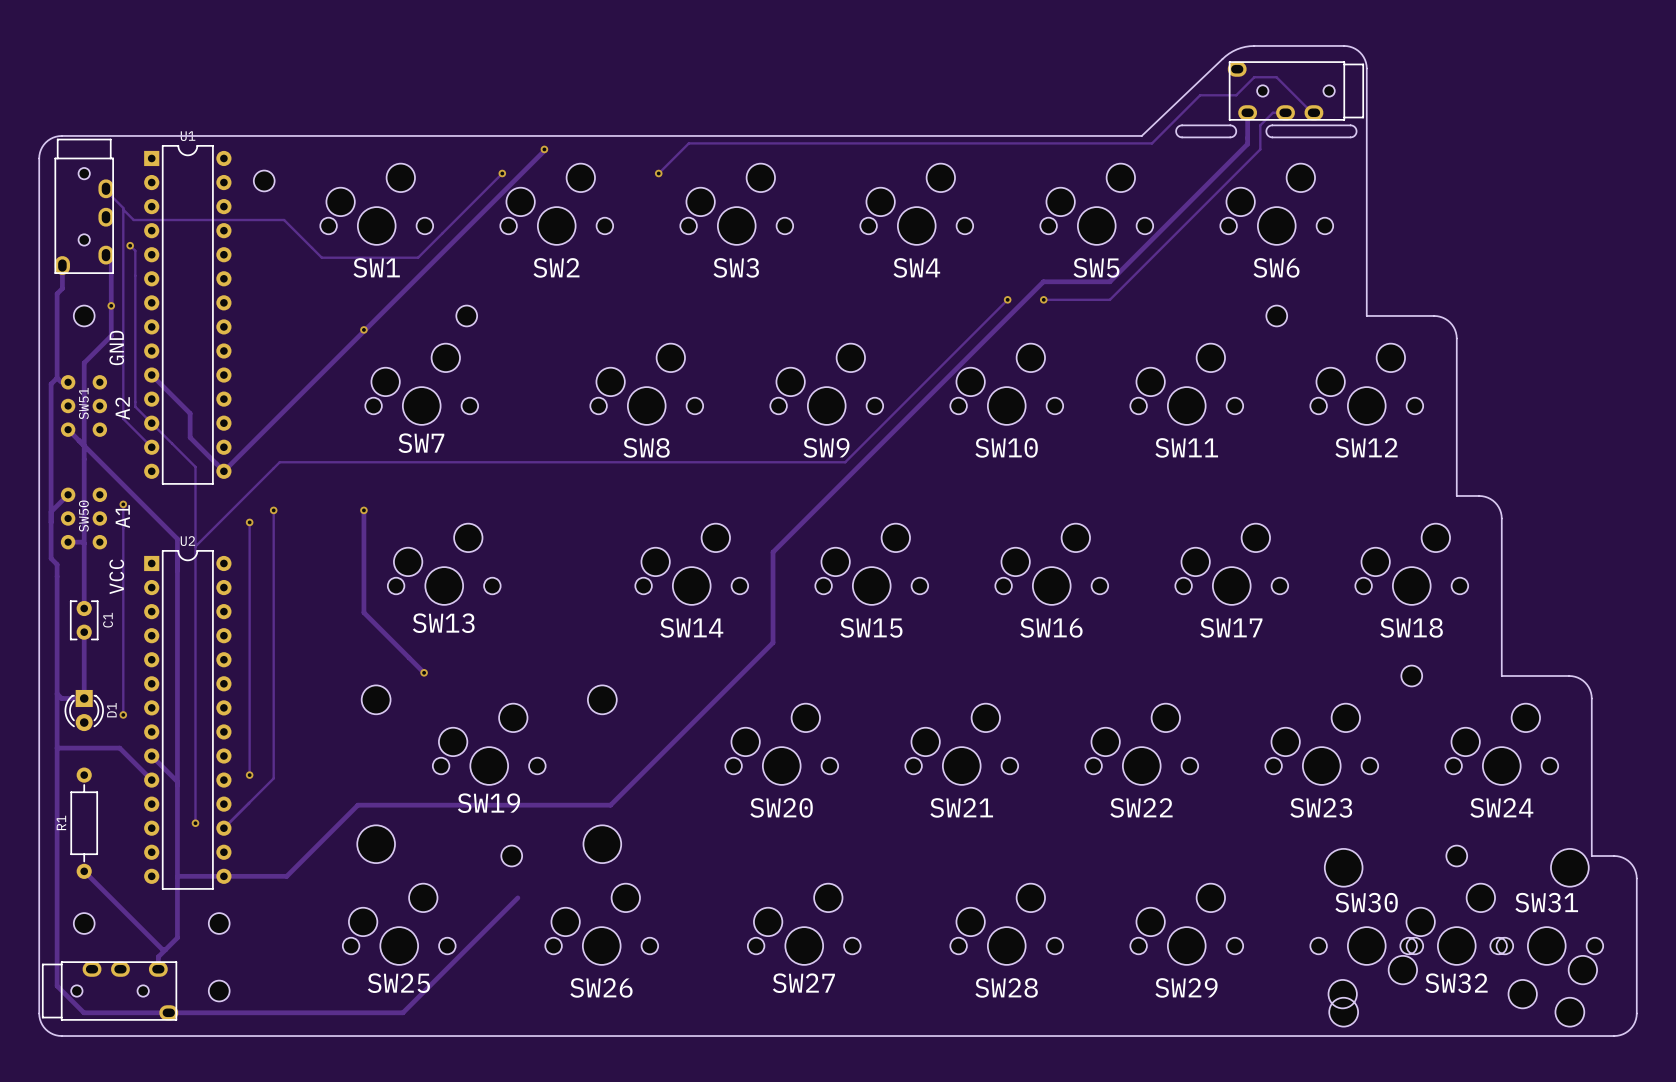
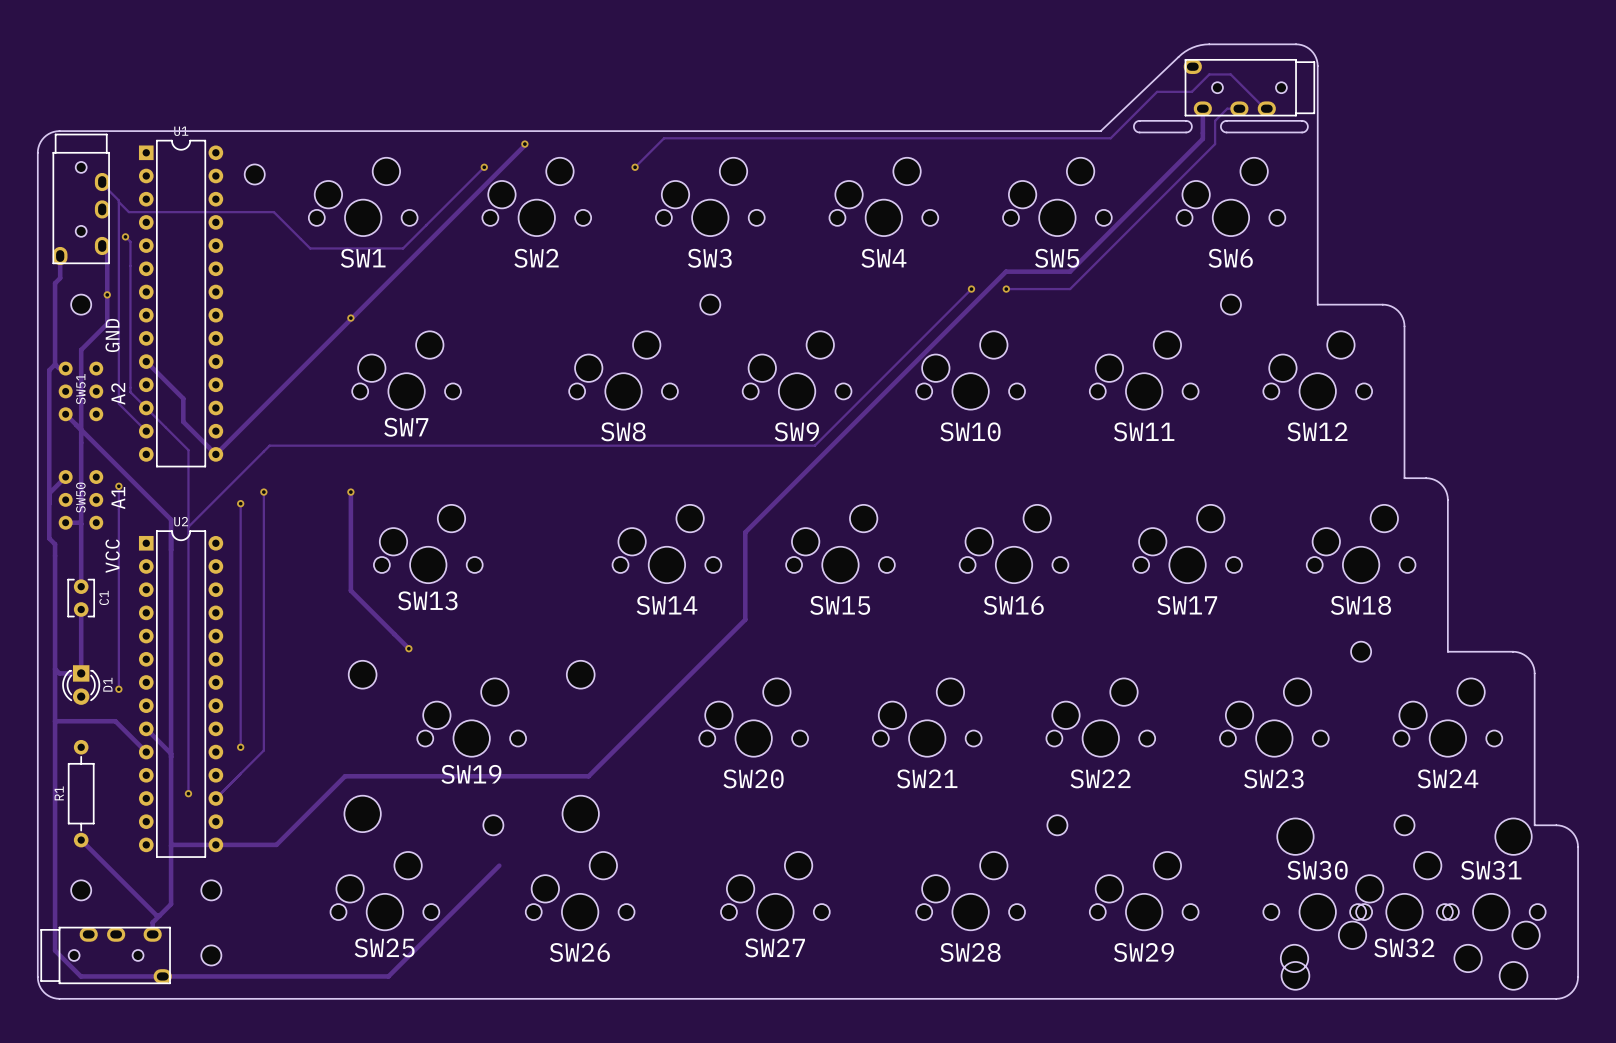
part: (466, 315) -> none
part: none -> (710, 304)
part: none -> (1057, 825)

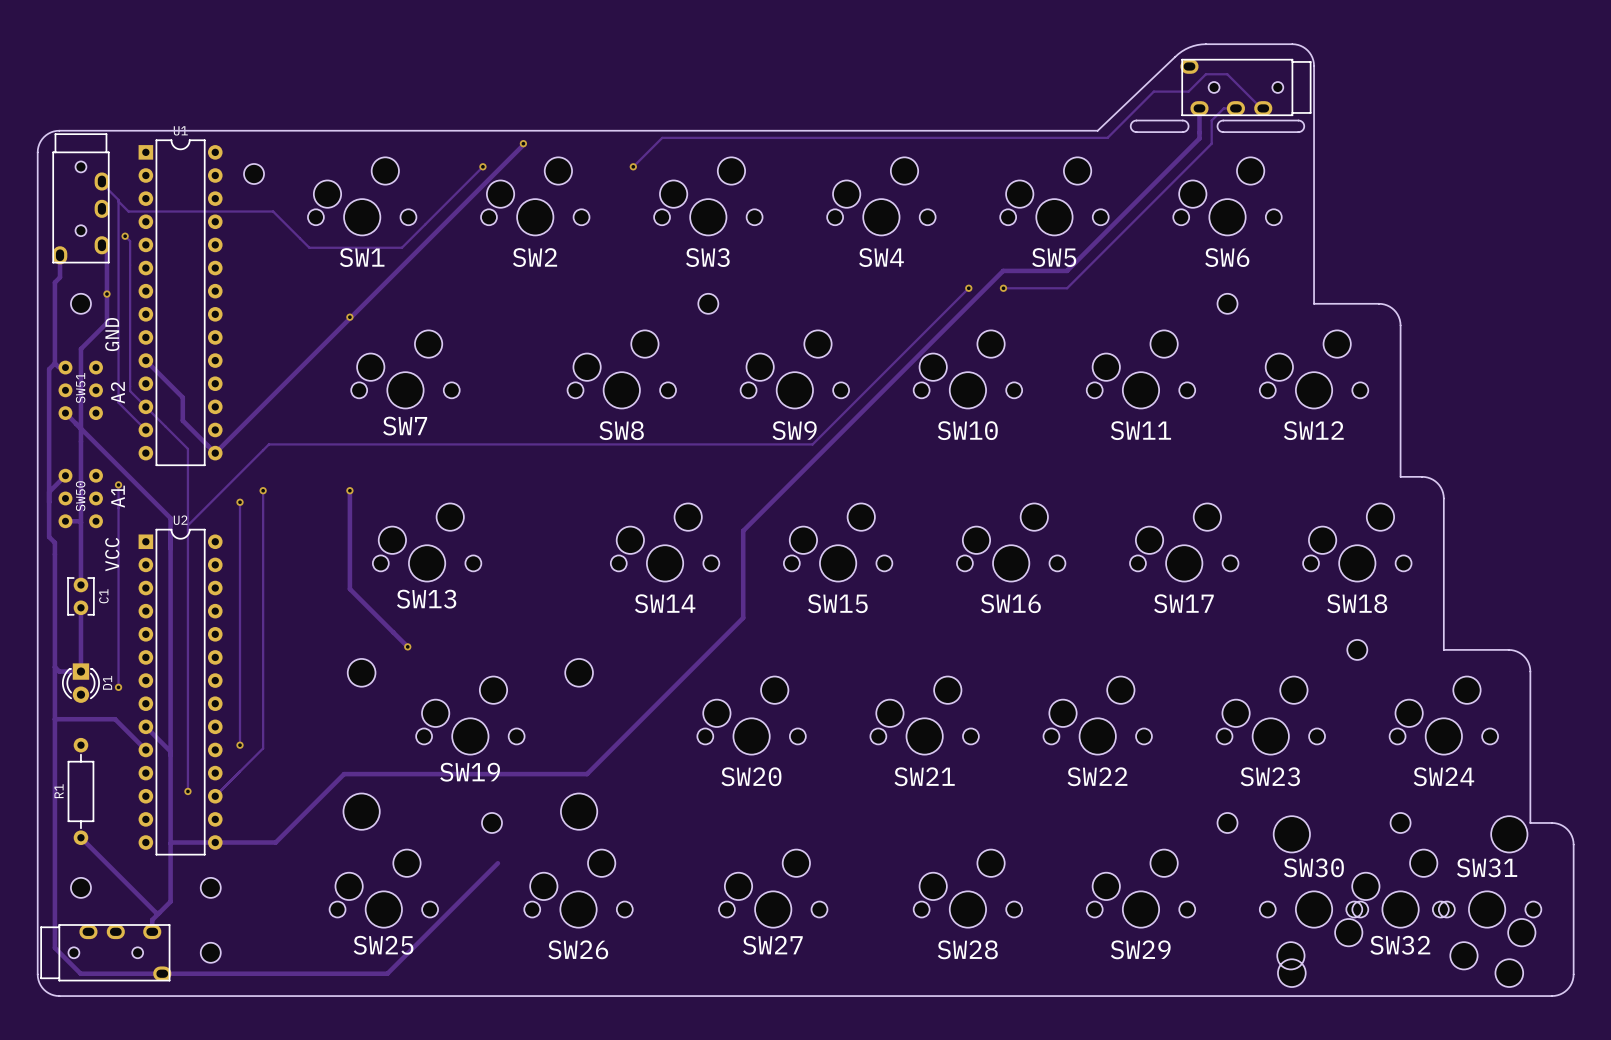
part position: (1057, 825) -> (1227, 822)

